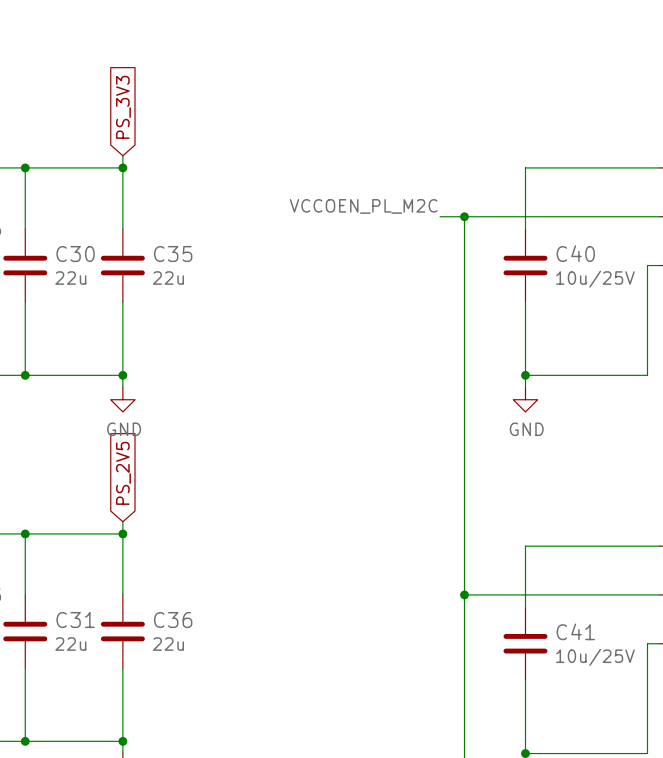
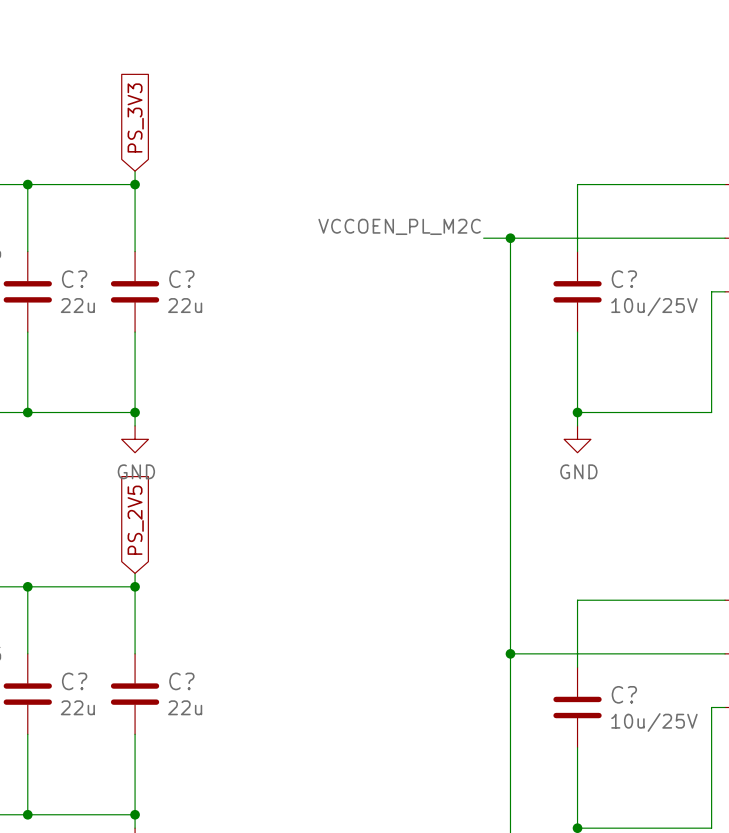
C40 name: C40 (575, 253) -> C? (624, 279)
C30 name: C30 (75, 254) -> C? (74, 279)
C35 name: C35 (173, 254) -> C? (181, 279)
C31 name: C31 (75, 620) -> C? (74, 681)
C36 name: C36 (173, 620) -> C? (181, 681)
C41 name: C41 (575, 631) -> C? (624, 694)

